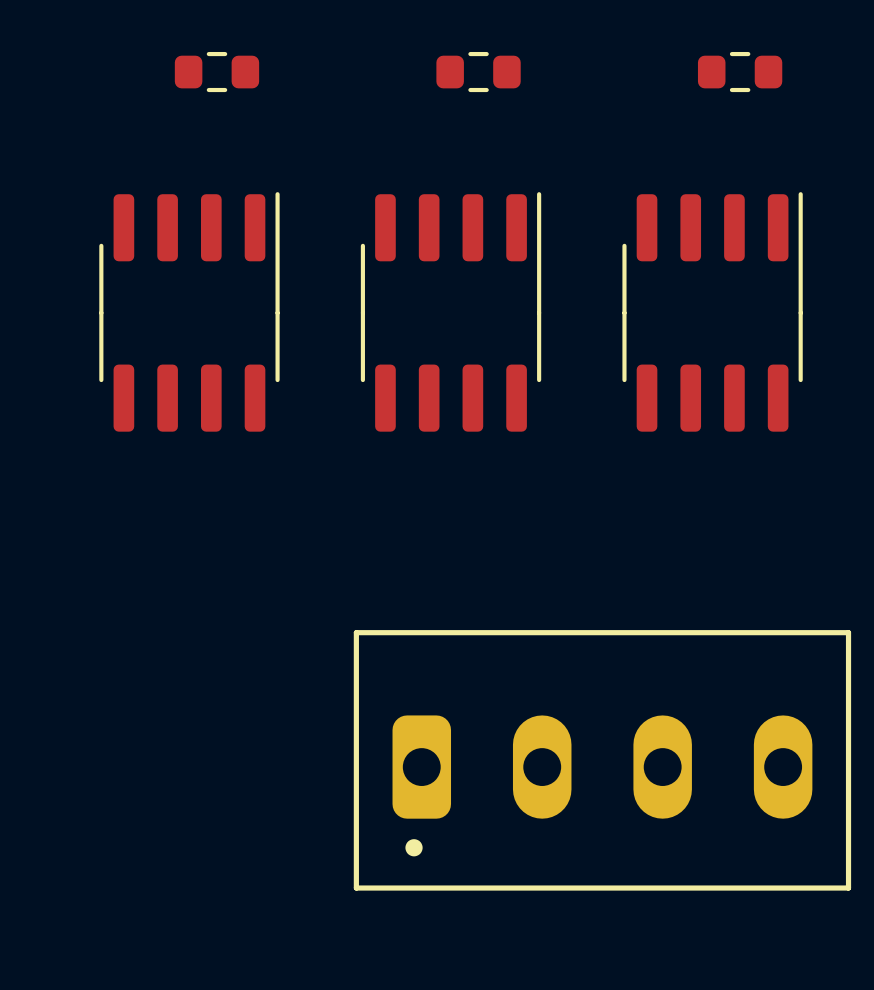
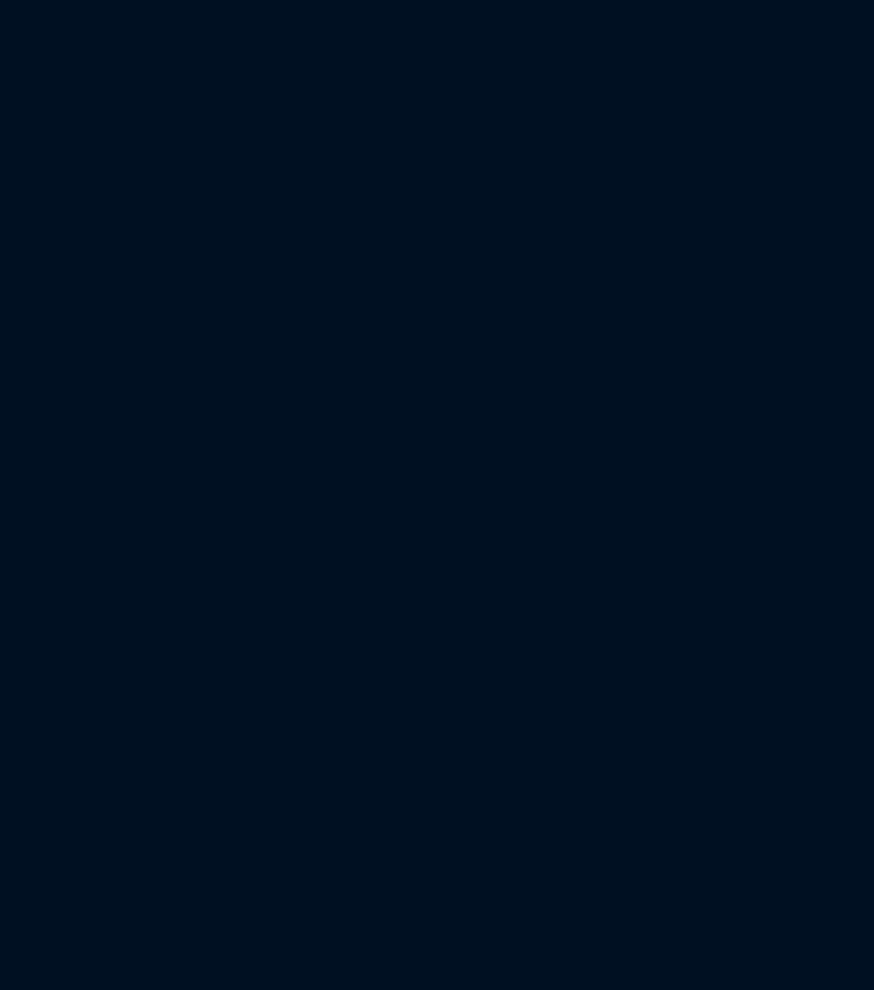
part: (216, 72) -> none
part: (478, 72) -> none
part: (740, 72) -> none
part: (189, 311) -> none
part: (451, 311) -> none
part: (712, 311) -> none
part: (602, 760) -> none

